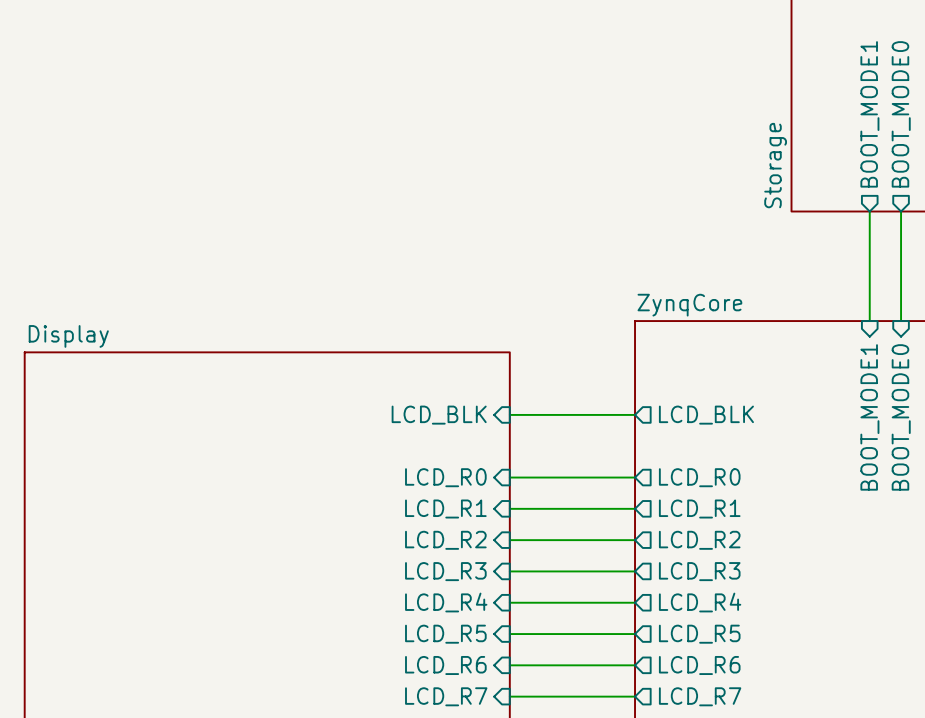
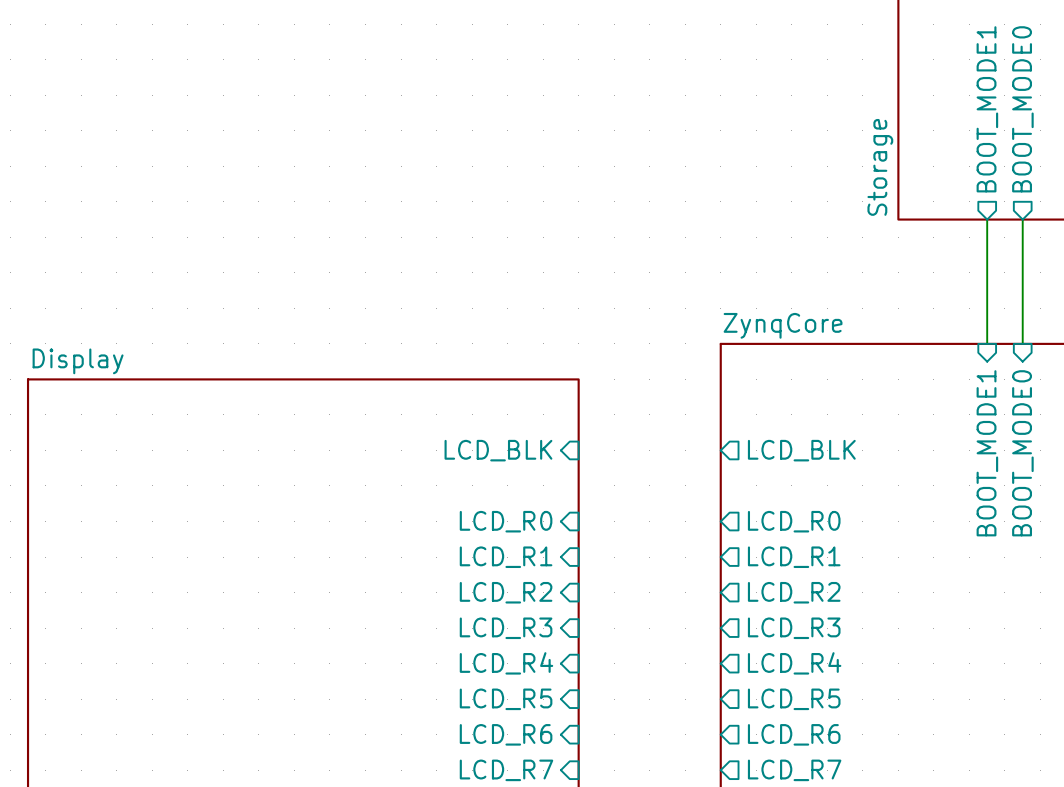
wire: (509, 414) (635, 414) -> none
wire: (509, 477) (635, 477) -> none
wire: (509, 508) (635, 508) -> none
wire: (509, 540) (635, 540) -> none
wire: (509, 571) (635, 571) -> none
wire: (509, 602) (635, 602) -> none
wire: (509, 634) (635, 634) -> none
wire: (509, 665) (635, 665) -> none
wire: (509, 696) (635, 696) -> none

